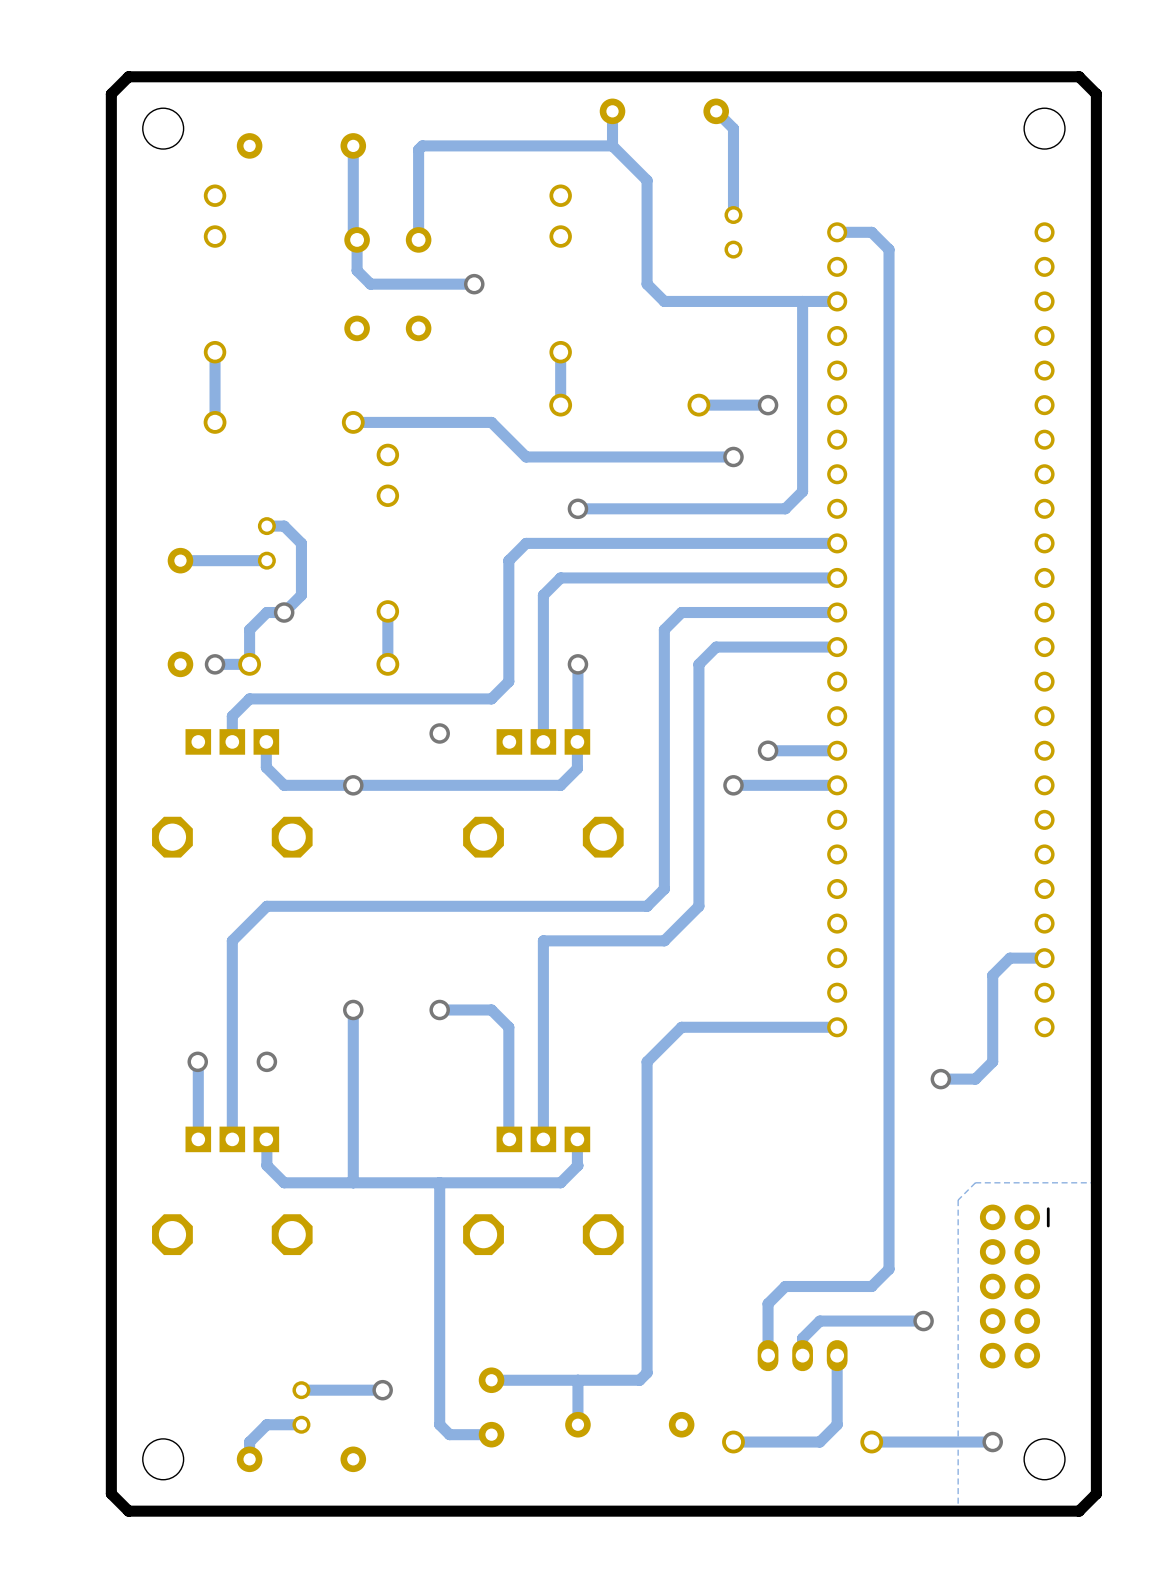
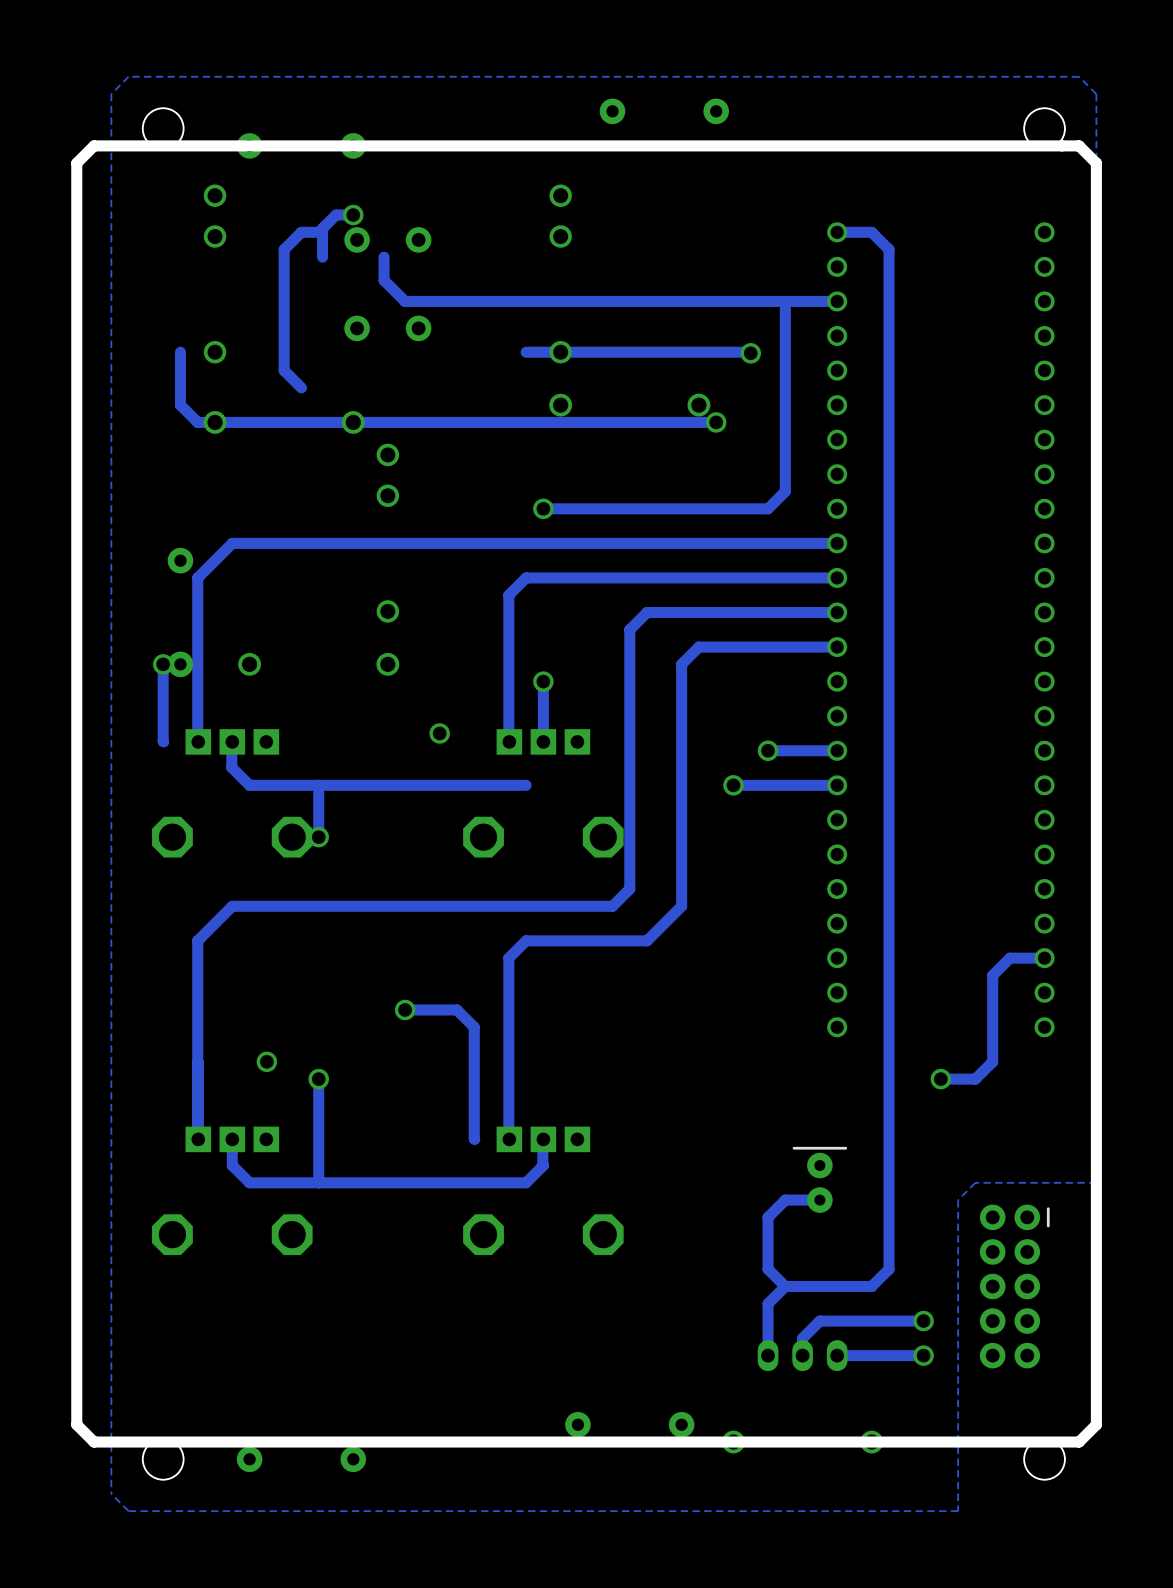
track: (612, 111) (612, 145) -> none
track: (716, 111) (733, 128) (733, 215) -> none
track: (353, 145) (353, 236) (357, 239) (357, 270) (370, 284) (474, 284) -> none
track: (612, 145) (647, 180) (647, 284) (664, 301) -> (384, 257) (384, 280) (405, 301) (664, 301)
track: (612, 145) (422, 145) (418, 149) (418, 239) -> none
board edge: (1096, 163) (1096, 94) (1079, 76) (128, 76) (111, 94) (111, 1493) (128, 1511) (1079, 1511) (1096, 1493) (1096, 1424) -> (1096, 163) (1079, 145) (94, 145) (76, 163) (76, 1424) (94, 1442) (1079, 1442) (1096, 1424)
track: none -> (353, 215) (336, 215) (322, 228) (322, 257)
via: none -> (353, 215)
track: none -> (322, 232) (301, 232) (284, 249) (284, 370) (301, 387)
part: (733, 232) -> none
via: (474, 284) -> none
track: (802, 301) (802, 491) (785, 508) (768, 508) -> (785, 301) (785, 491) (768, 508)
track: none -> (180, 352) (180, 405) (197, 422) (353, 422)
track: (215, 352) (215, 422) -> none
track: none -> (526, 352) (750, 353)
track: (560, 352) (560, 405) -> none
via: none -> (750, 353)
track: (768, 405) (698, 405) -> none
via: (768, 405) -> none
track: (491, 422) (526, 456) (733, 456) -> (491, 422) (716, 422)
via: none -> (716, 422)
via: (733, 456) -> none
track: none -> (577, 508) (543, 508)
via position: (577, 508) -> (543, 508)
track: (266, 526) (284, 526) (301, 543) (301, 595) (284, 612) (266, 612) (249, 629) (249, 664) (215, 664) -> none
part: (266, 543) -> none
track: (526, 543) (508, 560) (508, 595) -> (560, 577) (526, 577) (508, 595)
track: none -> (526, 543) (232, 543) (197, 577) (197, 741)
track: (266, 560) (180, 560) -> none
track: (560, 577) (543, 595) (543, 681) -> none
track: (387, 611) (387, 664) -> none
via: (284, 612) -> none
track: (681, 612) (664, 629) (664, 889) (647, 906) (612, 906) -> (681, 612) (647, 612) (629, 629) (629, 889) (612, 906)
track: (716, 647) (698, 664) (698, 906) (664, 940) (647, 940) -> (716, 647) (698, 647) (681, 664) (681, 906) (647, 940)
track: none -> (163, 664) (163, 741)
via: none -> (163, 664)
via: (215, 664) -> none
track: (577, 664) (577, 768) (560, 785) (526, 785) -> none
via position: (577, 664) -> (543, 681)
track: (508, 681) (491, 698) (249, 698) (232, 716) (232, 741) -> (508, 681) (508, 741)
track: (266, 741) (266, 767) (284, 785) -> (231, 741) (231, 767) (249, 785) (284, 785)
track: none -> (318, 785) (318, 837)
via position: (353, 785) -> (318, 837)
track: (266, 906) (232, 940) (232, 1139) -> (266, 906) (232, 906) (197, 940) (197, 1139)
track: (543, 940) (543, 1139) -> none
track: (353, 1009) (353, 1182) -> none
via: (353, 1009) -> none
via: none -> (405, 1009)
track: none -> (439, 1009) (405, 1009)
via: (439, 1009) -> none
track: (456, 1009) (491, 1009) (508, 1027) -> (543, 940) (526, 940) (508, 958) (508, 1027)
track: none -> (456, 1009) (474, 1027) (474, 1139)
track: (837, 1027) (681, 1027) (647, 1061) (647, 1372) (639, 1380) (491, 1380) -> none
via: (197, 1061) -> none
track: none -> (318, 1079) (318, 1182)
via: none -> (318, 1079)
track: (266, 1139) (266, 1165) (284, 1182) -> (231, 1139) (232, 1165) (249, 1182) (284, 1182)
track: (577, 1139) (577, 1165) (560, 1182) (526, 1182) -> (542, 1139) (543, 1165) (526, 1182)
part: none -> (819, 1179)
track: (439, 1182) (439, 1424) (449, 1434) (491, 1434) -> none
track: none -> (819, 1200) (785, 1200) (768, 1217) (768, 1269) (785, 1286)
track: (837, 1355) (837, 1424) (819, 1442) (733, 1442) -> (837, 1355) (923, 1355)
via: none -> (923, 1355)
track: (577, 1380) (577, 1424) -> none
track: (382, 1390) (301, 1390) -> none
via: (382, 1390) -> none
part: (301, 1407) -> none
part: (491, 1407) -> none
track: (301, 1424) (266, 1424) (249, 1442) (249, 1459) -> none
track: (992, 1442) (871, 1442) -> none
via: (992, 1442) -> none

